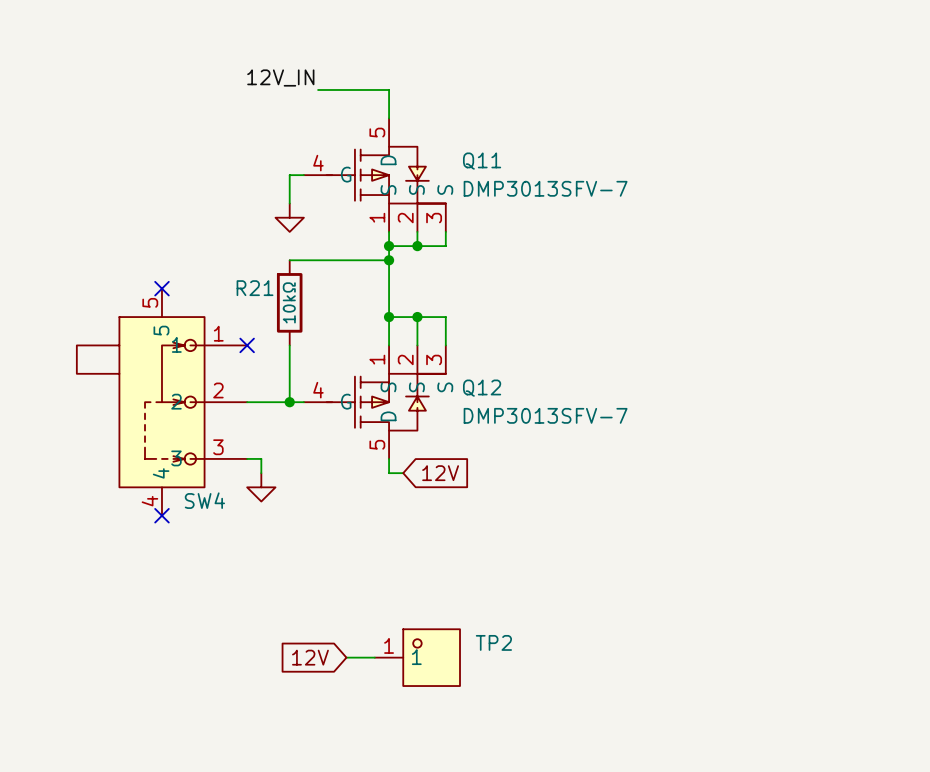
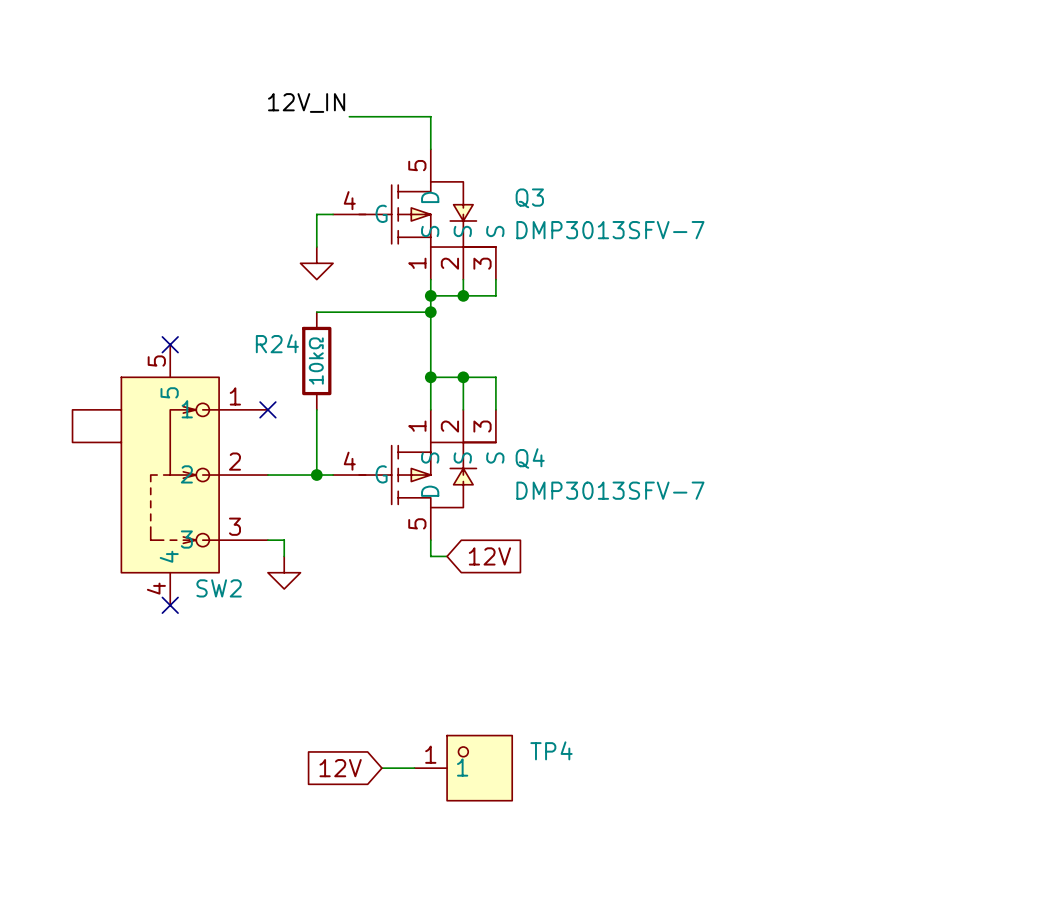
Q11 name: Q11 (482, 161) -> Q3 (529, 198)
R21 name: R21 (255, 288) -> R24 (277, 343)
Q12 name: Q12 (482, 388) -> Q4 (530, 458)
SW4 name: SW4 (204, 500) -> SW2 (219, 588)
TP2 name: TP2 (493, 642) -> TP4 (551, 750)

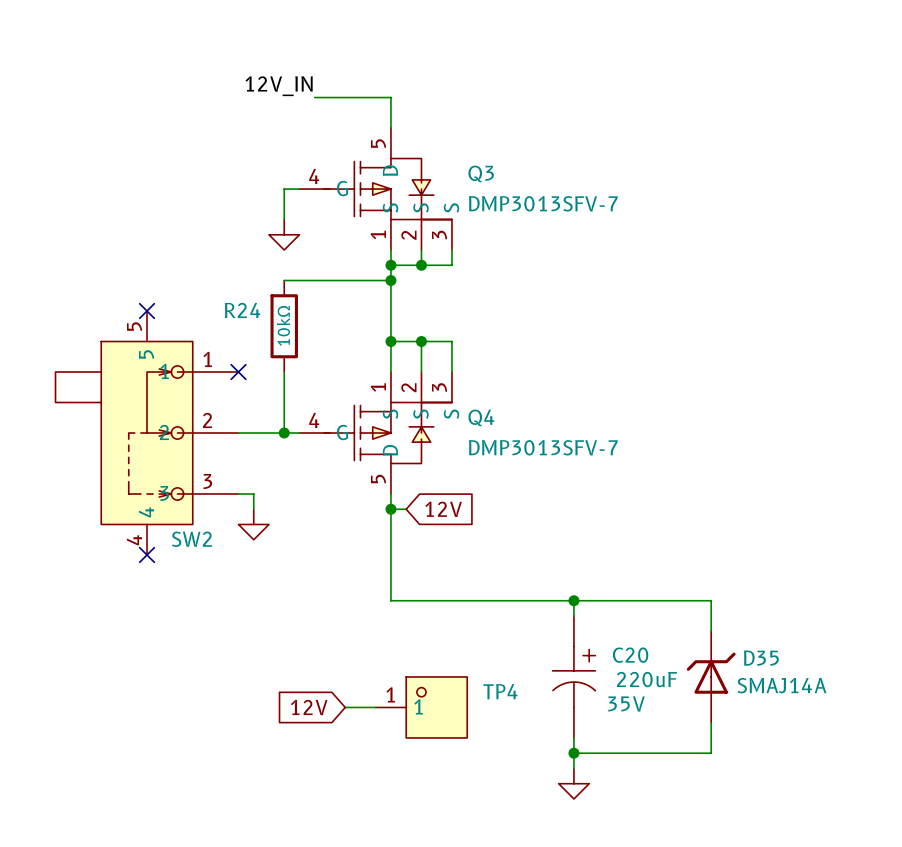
wire: none -> (390, 509) (390, 600) (711, 600) (711, 631)
junction: none -> (390, 509)
wire: none -> (573, 600) (573, 615)
junction: none -> (573, 600)
C20: none -> 220uF (574, 676)
D35: none -> SMAJ14A (711, 676)
wire: none -> (711, 722) (711, 753) (573, 753)
wire: none -> (573, 737) (573, 768)
junction: none -> (573, 753)
power symbol: none -> (573, 783)

